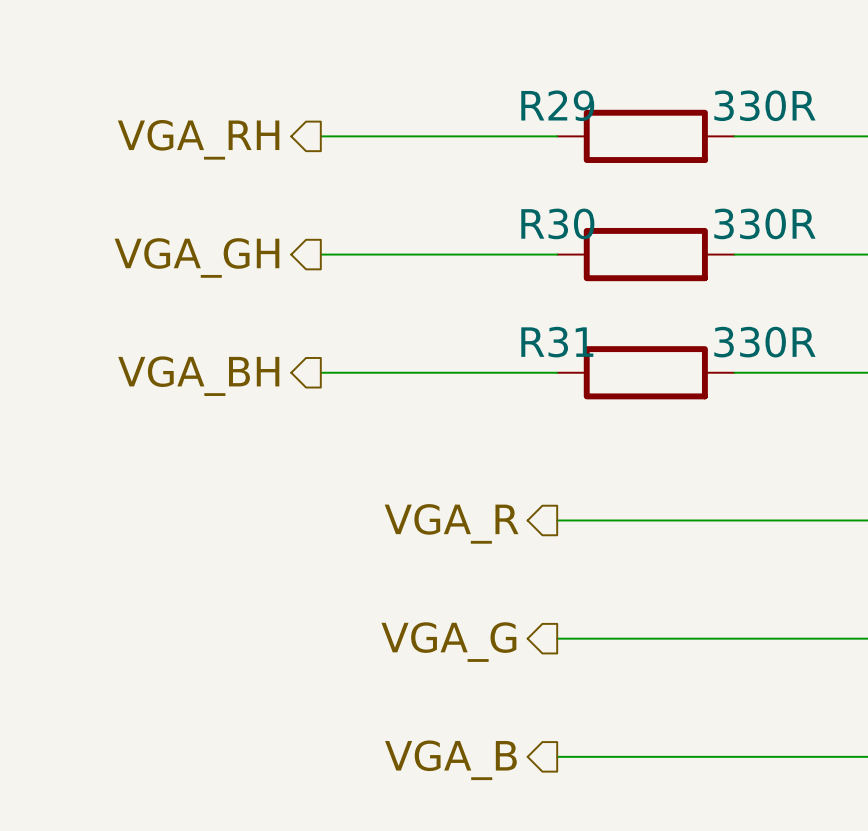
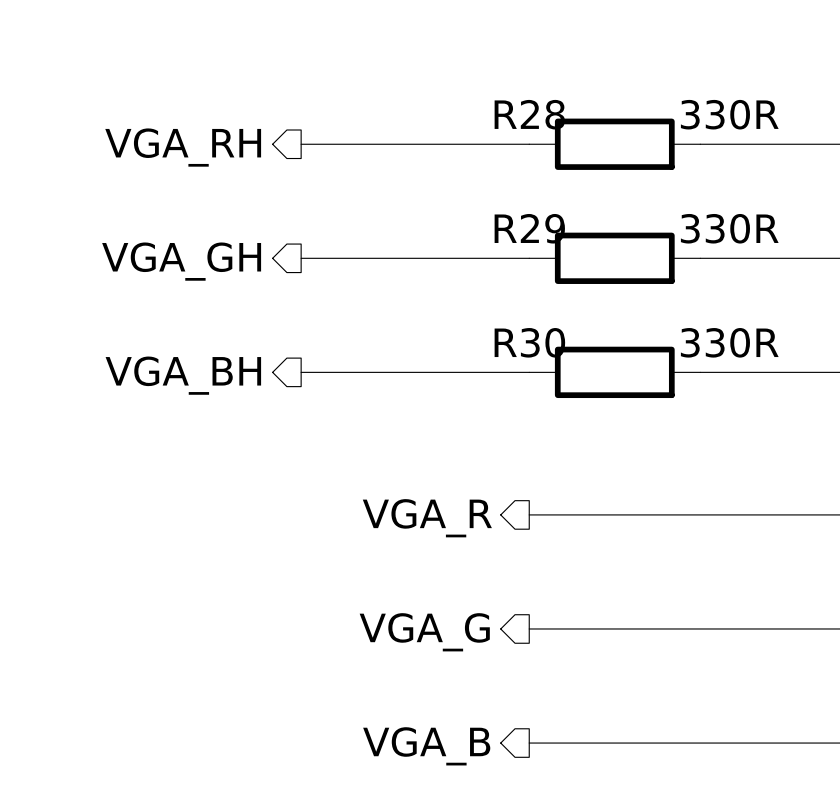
R29 name: R29 (557, 105) -> R28 (529, 114)
R30 name: R30 (557, 223) -> R29 (529, 228)
R31 name: R31 (557, 342) -> R30 (529, 342)

